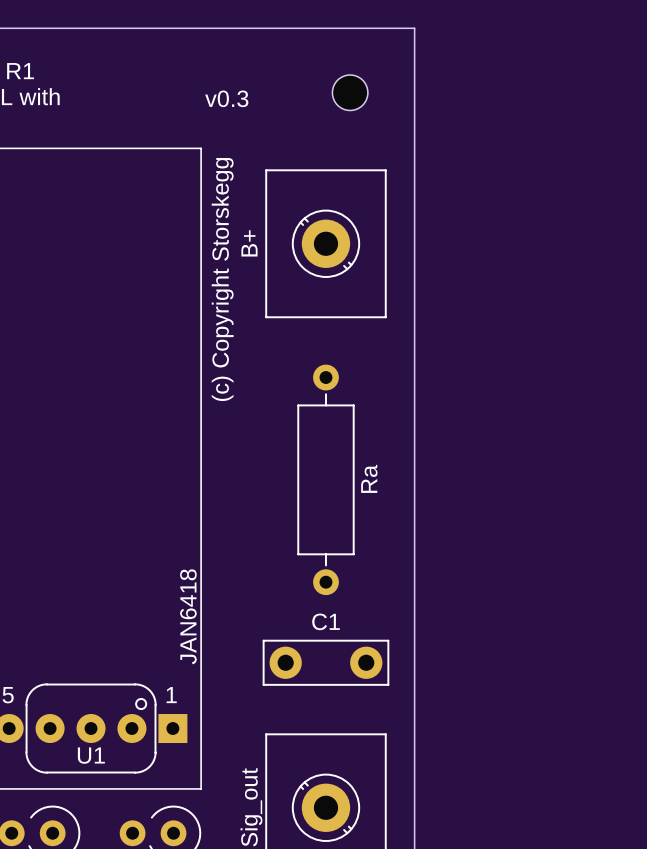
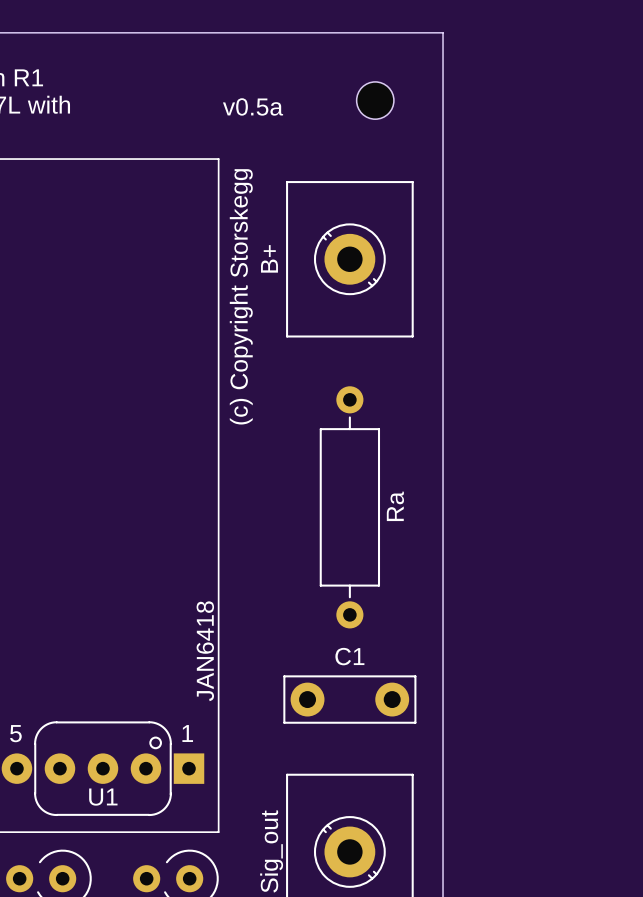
text: v0.3 (226, 98) -> v0.5a (253, 106)

